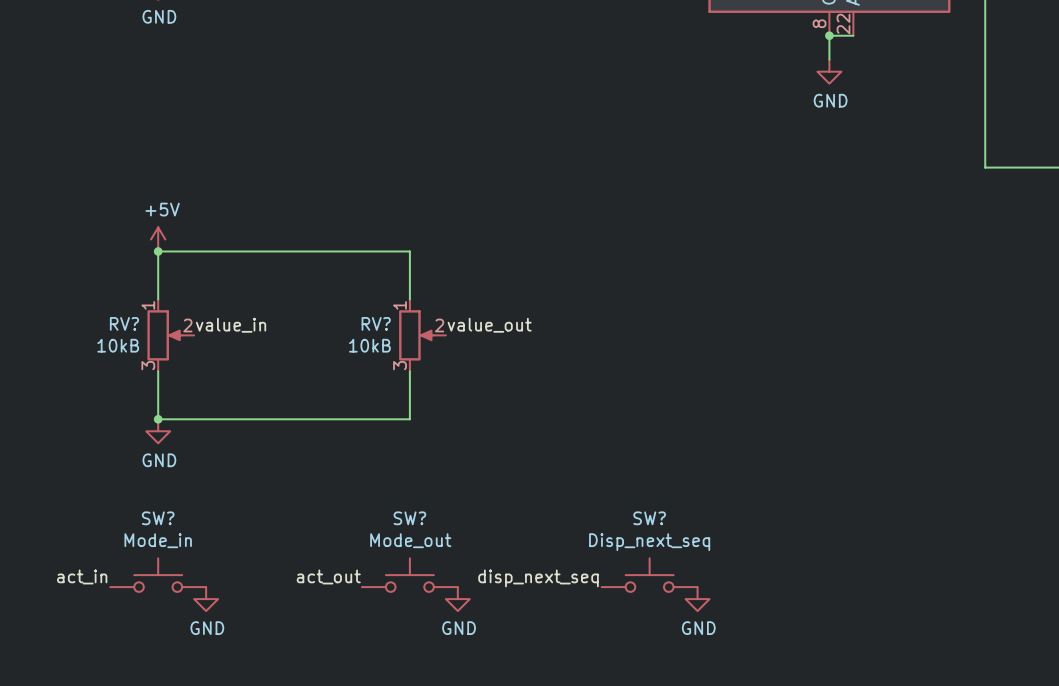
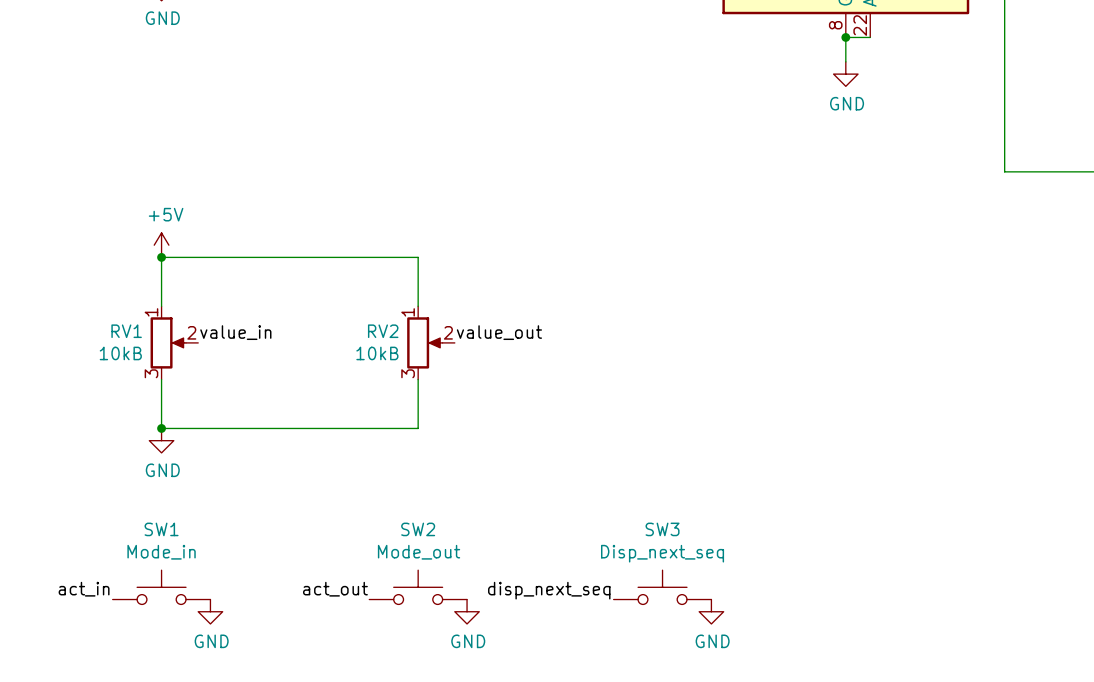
RV? name: RV? (124, 323) -> RV1 (126, 331)
RV? name: RV? (376, 323) -> RV2 (383, 331)
SW? name: SW? (158, 518) -> SW1 (161, 529)
SW? name: SW? (409, 518) -> SW2 (418, 529)
SW? name: SW? (649, 518) -> SW3 (662, 529)

